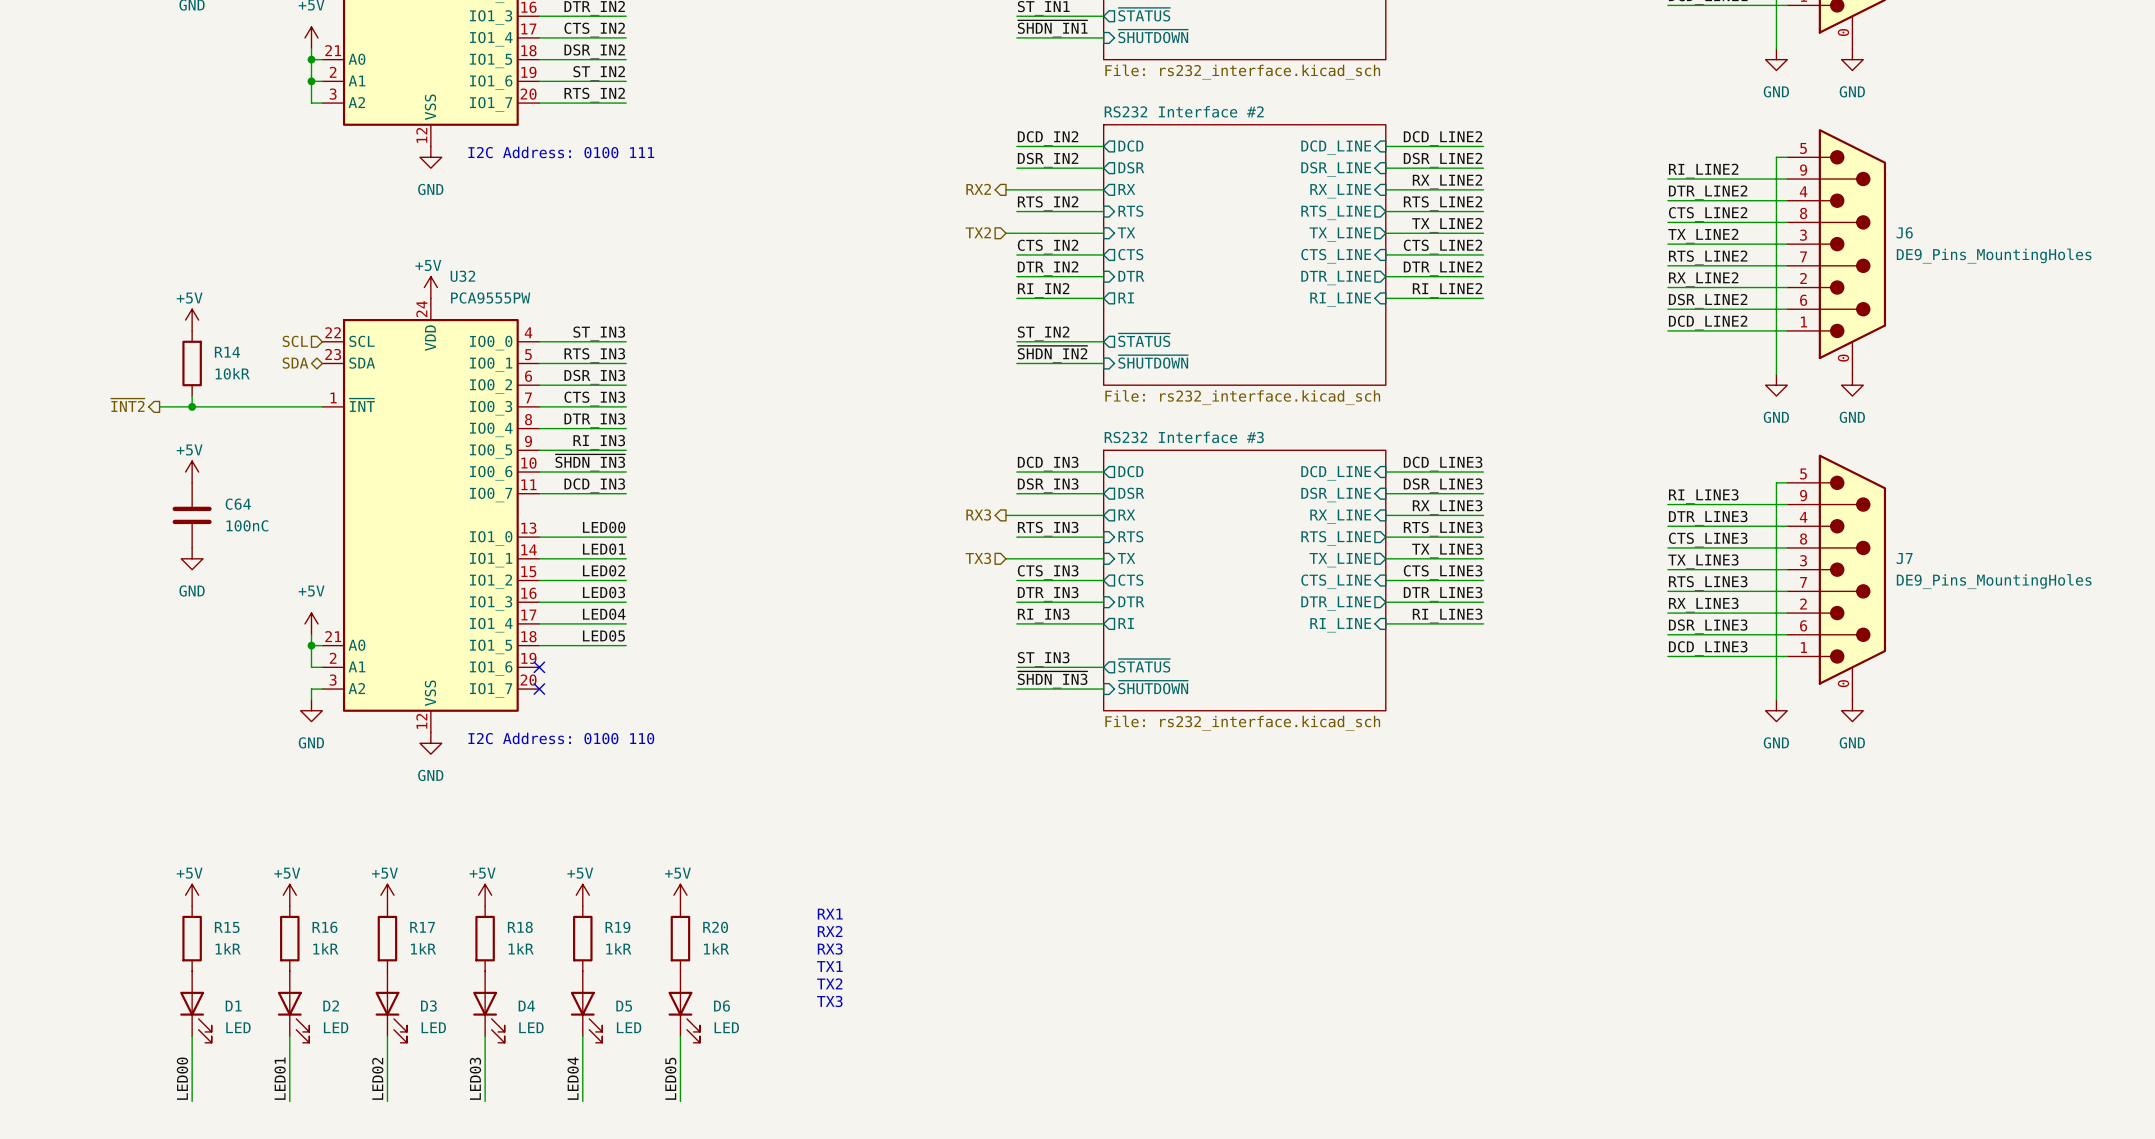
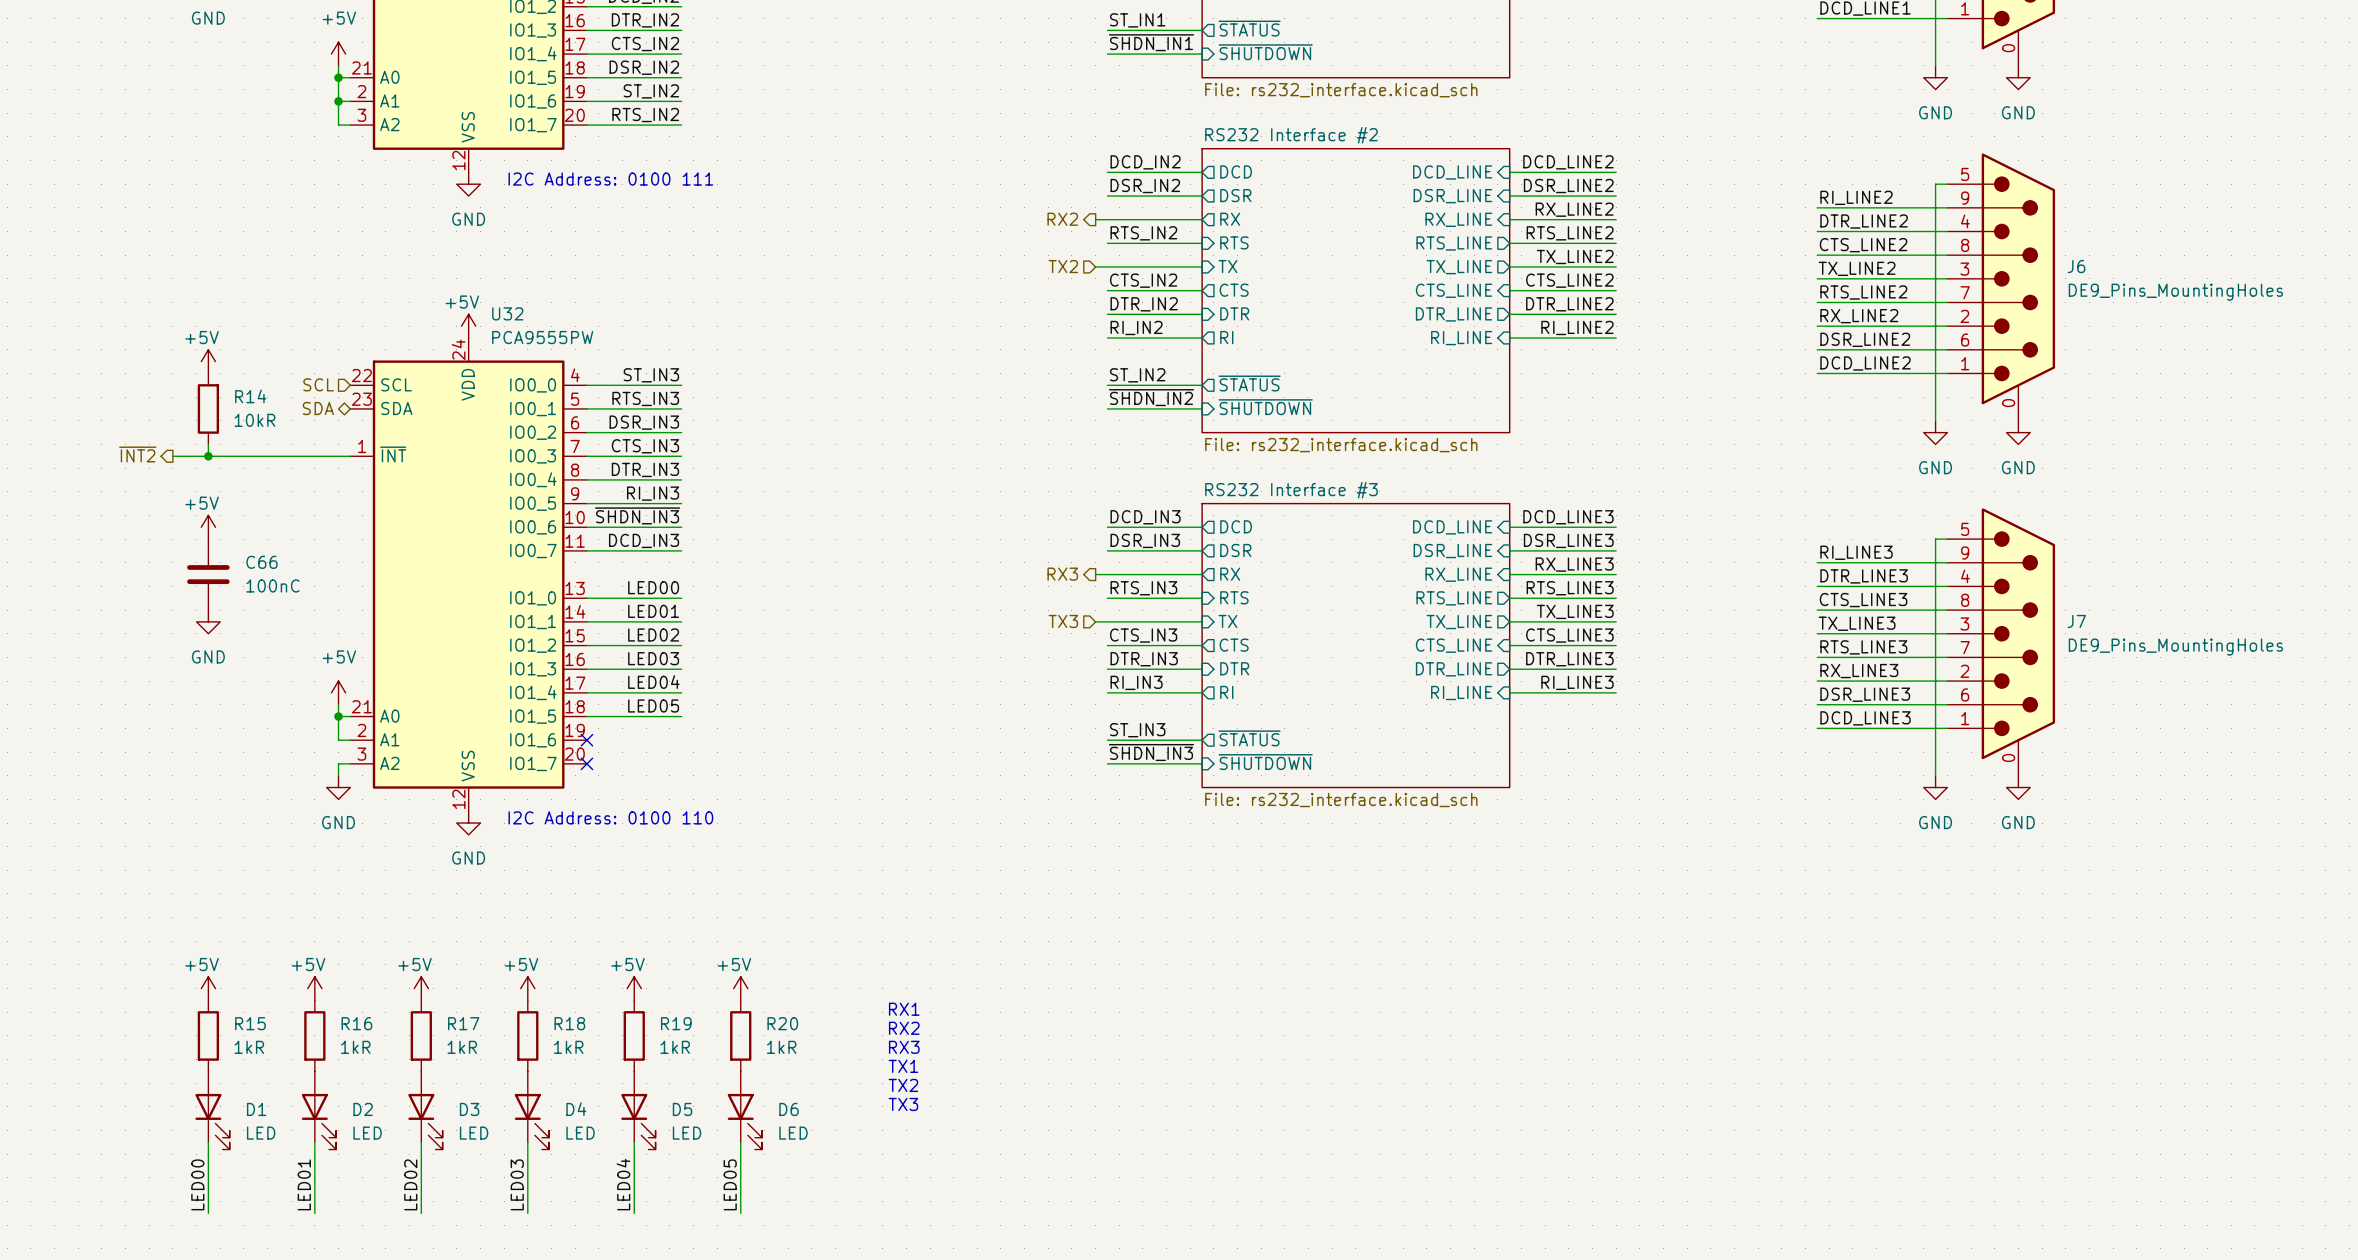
C64 name: C64 (238, 504) -> C66 (261, 562)

